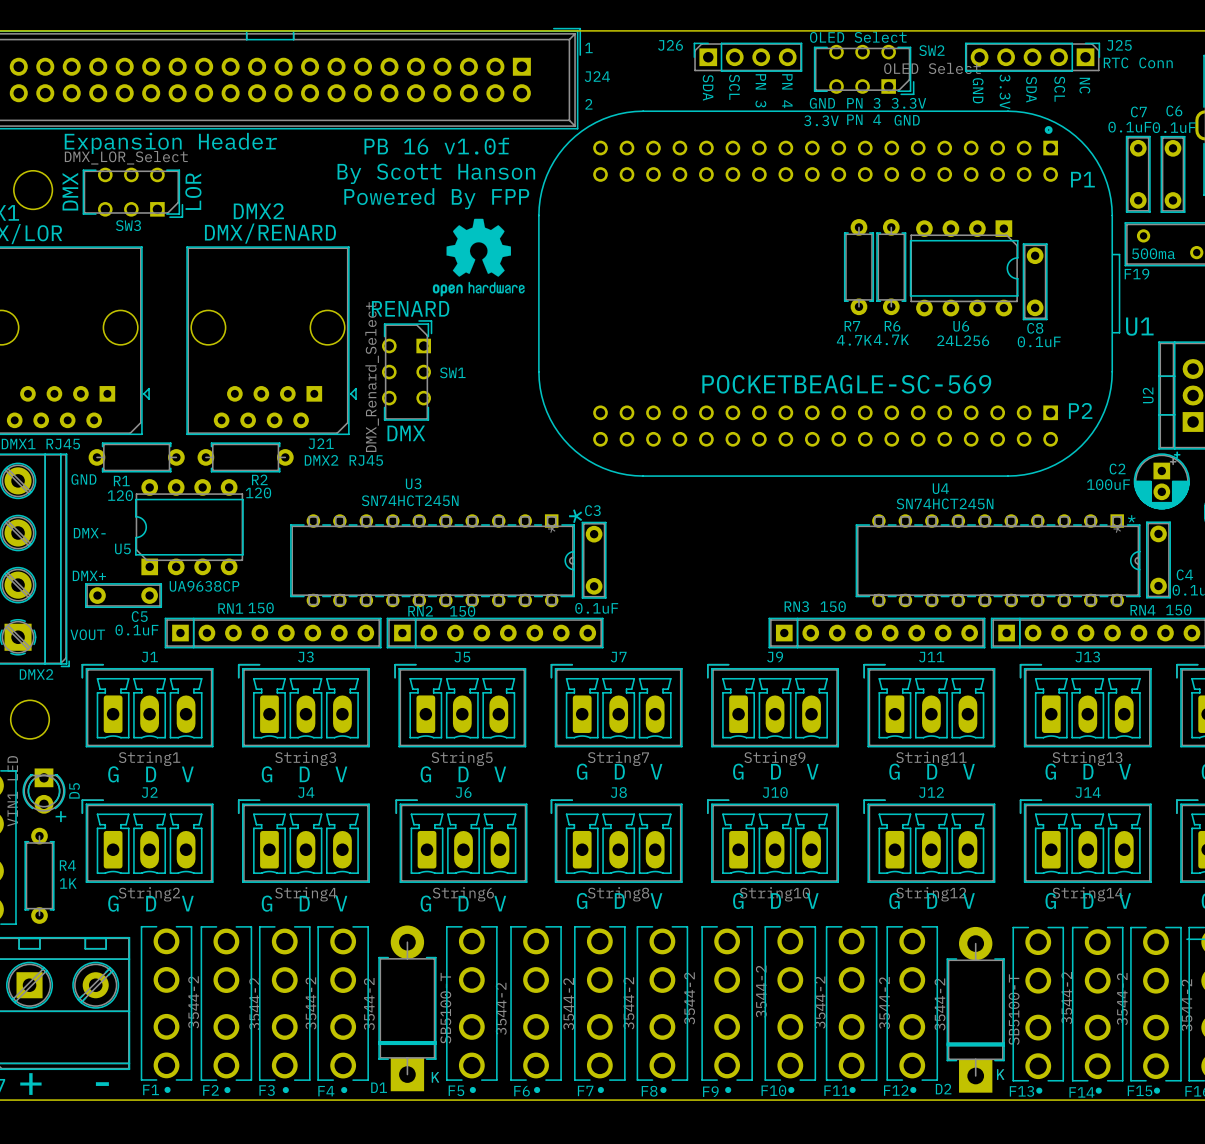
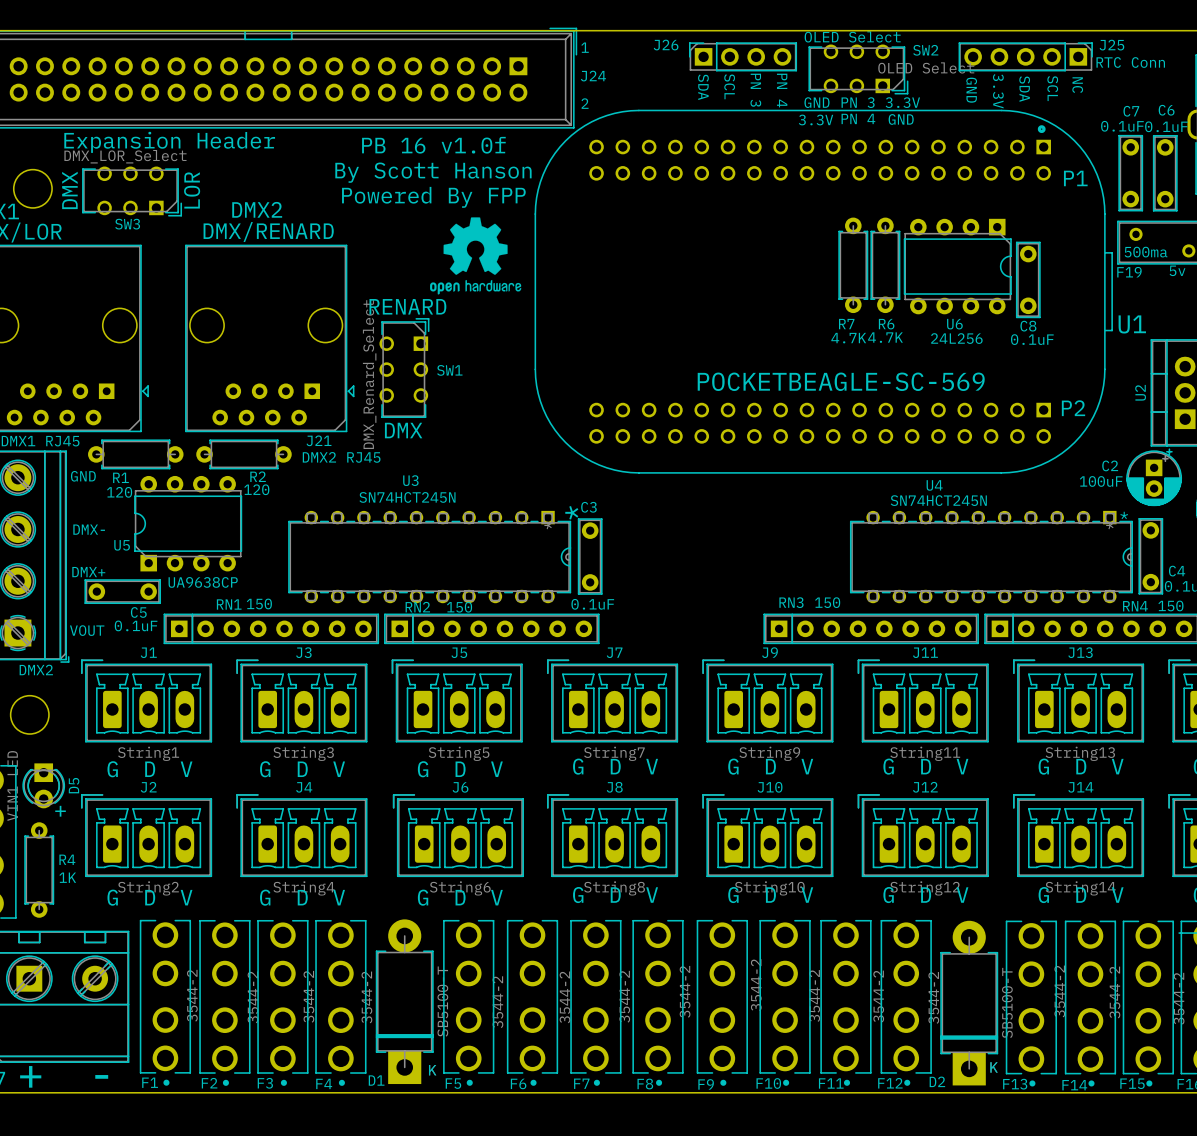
text: none -> 5v (1177, 270)

